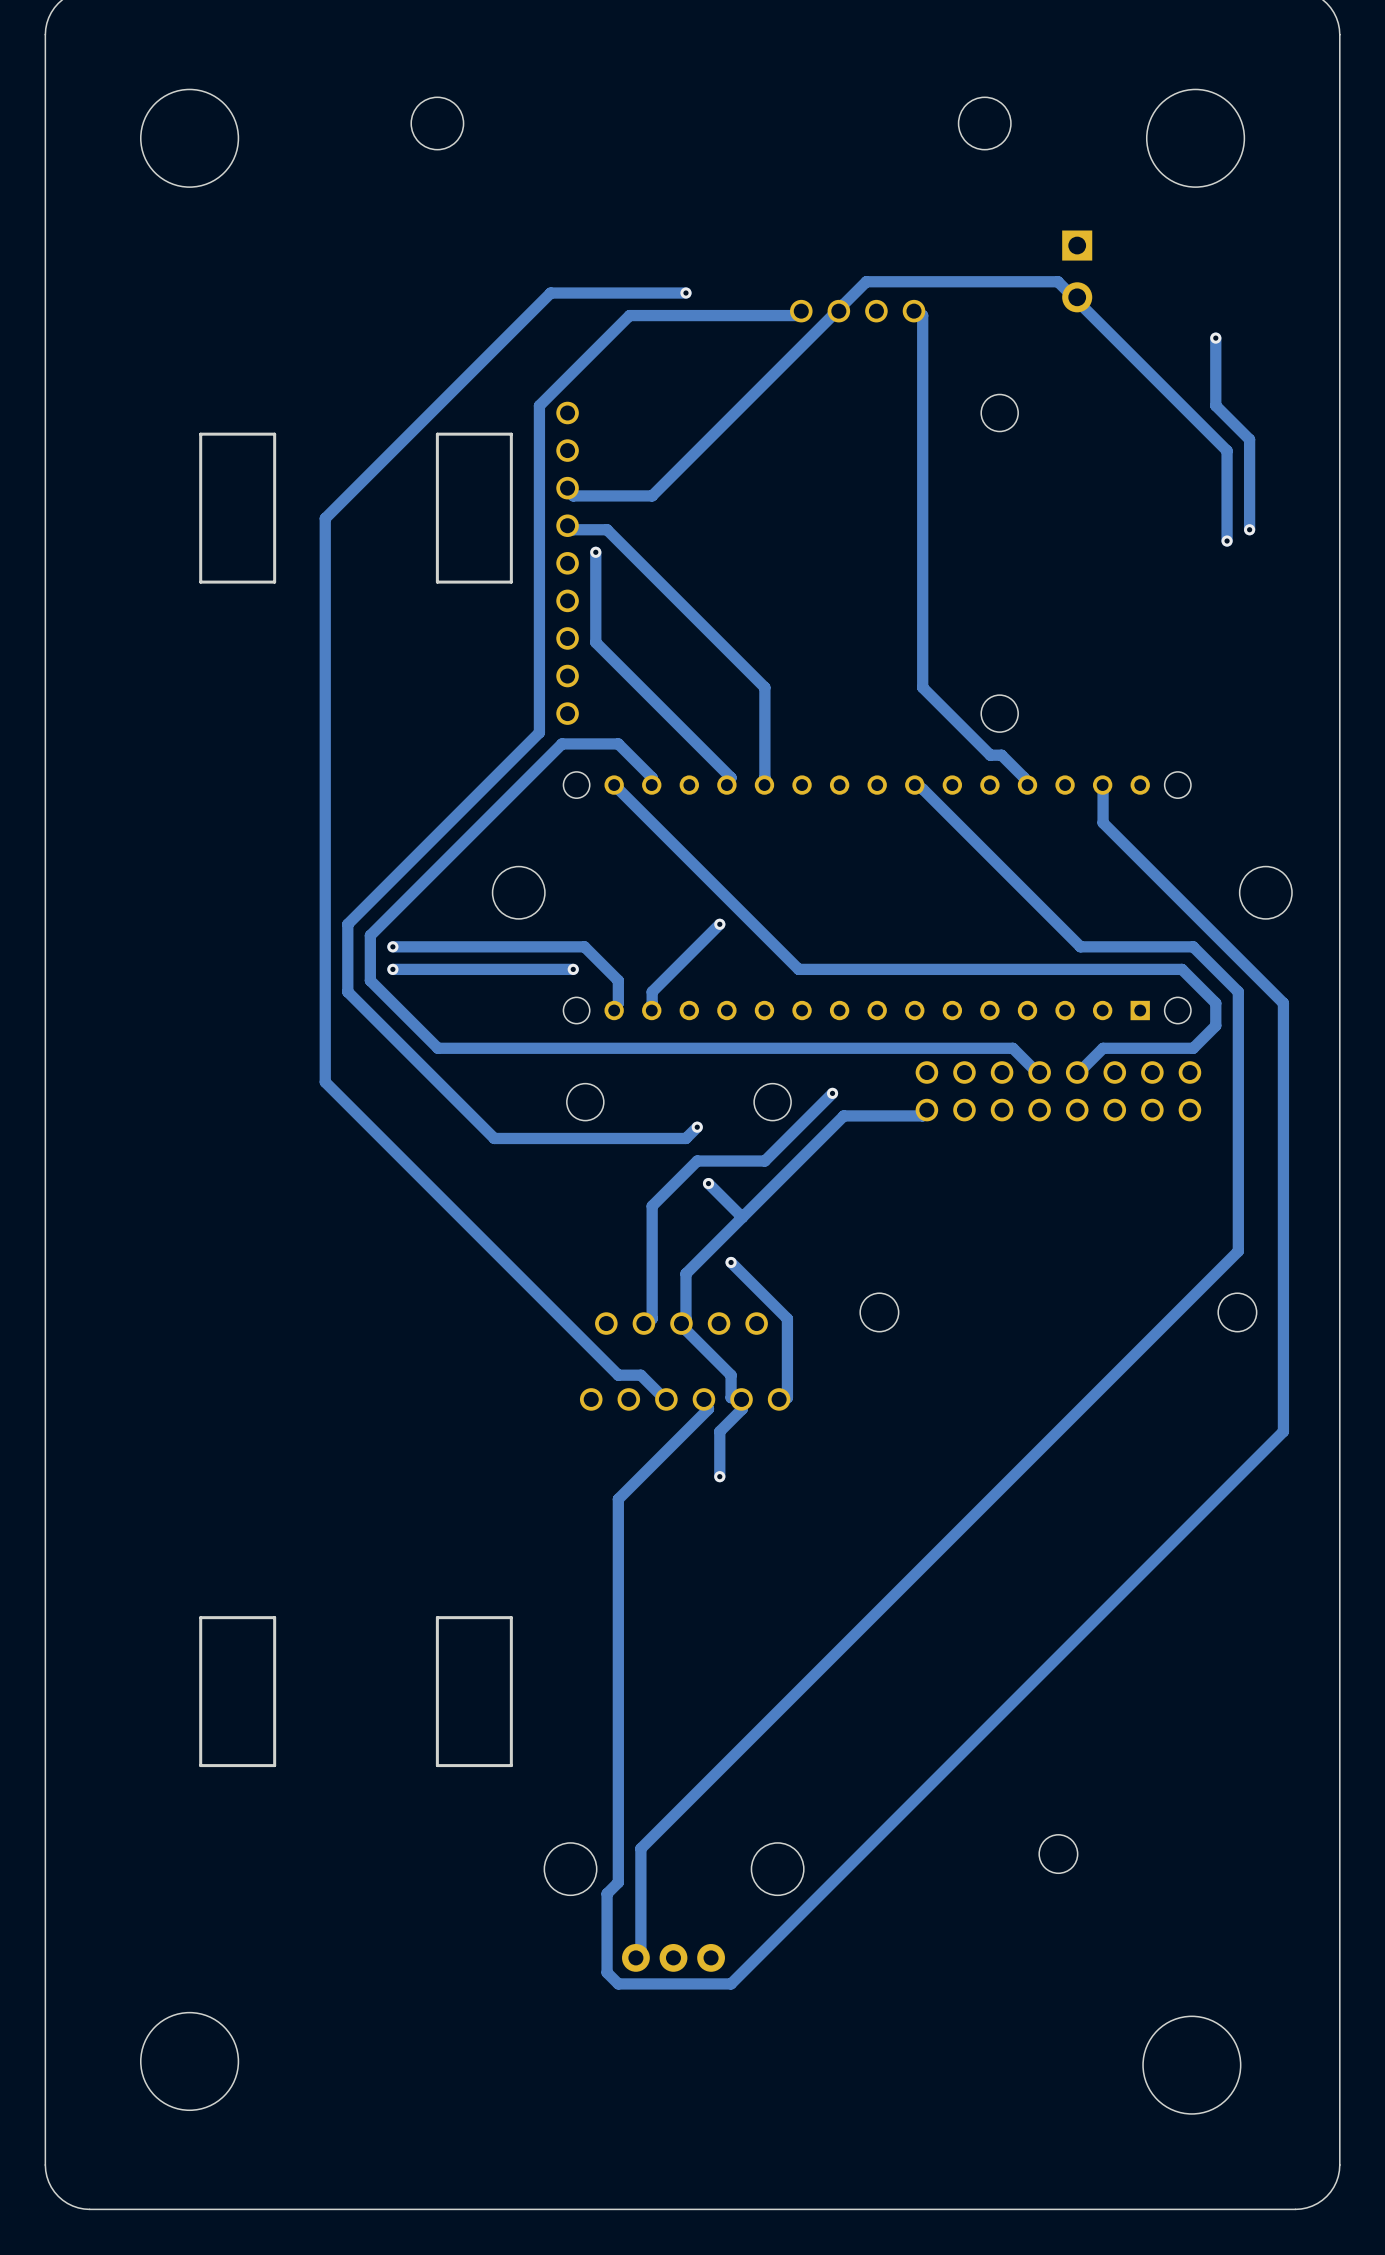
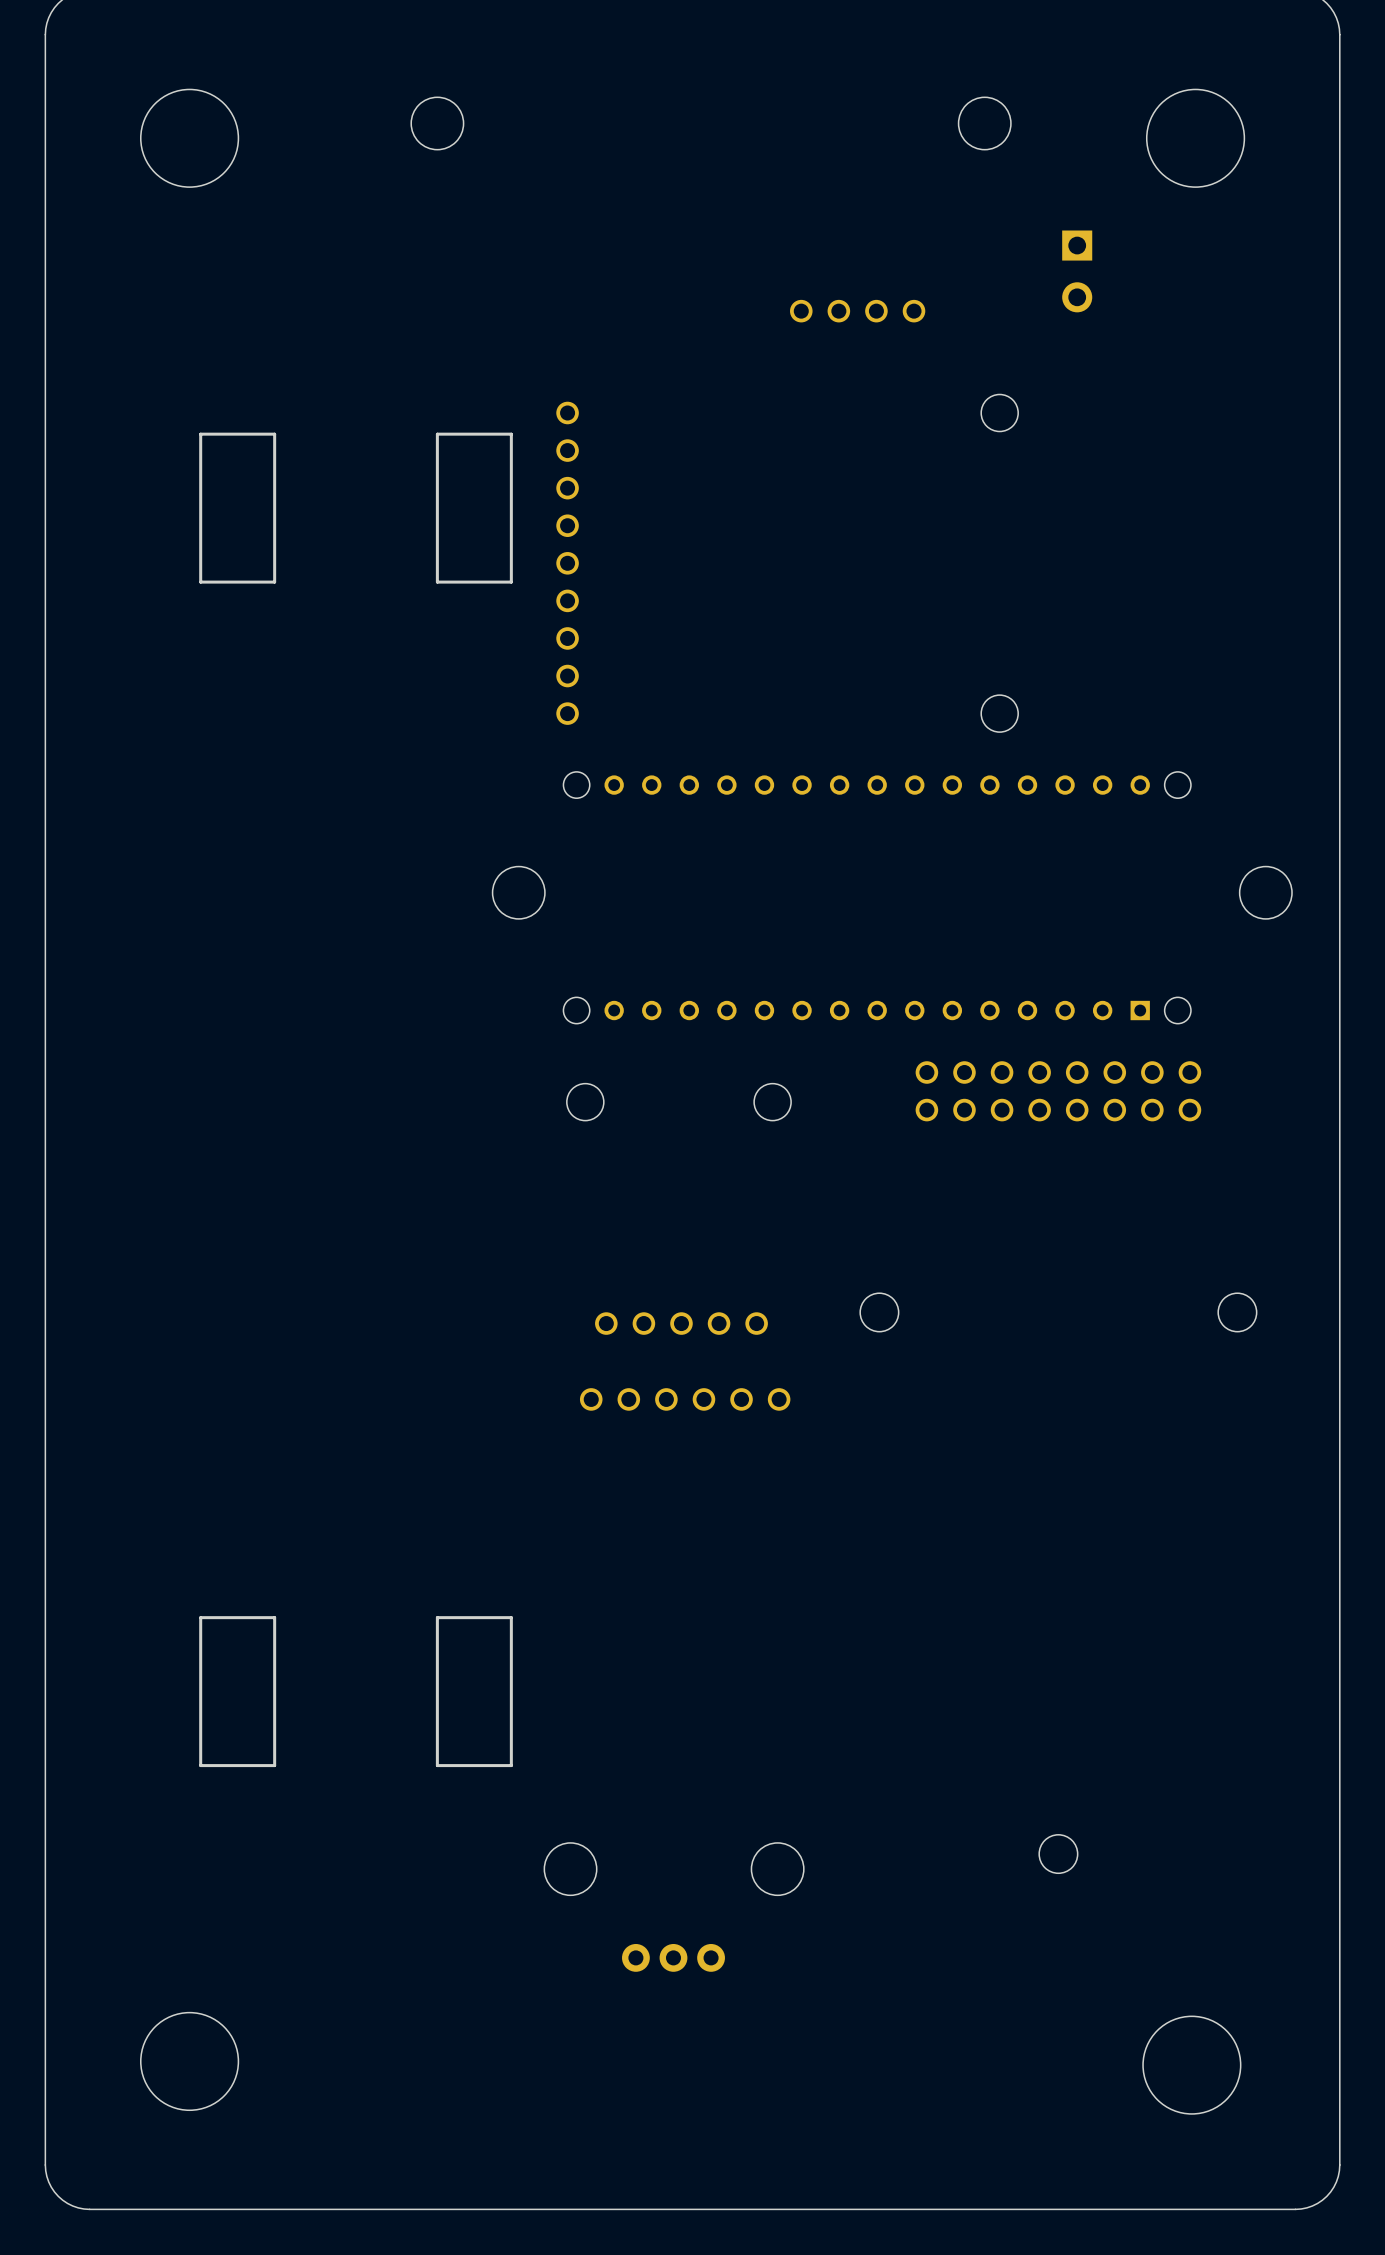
track: (685, 293) (550, 293) (325, 518) (325, 1082) (618, 1375) (640, 1375) (666, 1399) -> none
via: (685, 293) -> none
track: (801, 311) (798, 315) (629, 315) (539, 405) (539, 732) (347, 924) (347, 991) (494, 1138) (685, 1138) (697, 1127) -> none
track: (914, 311) (922, 315) (922, 687) (990, 755) (1001, 755) (1024, 777) (1027, 785) -> none
track: (1215, 338) (1215, 405) (1249, 439) (1249, 529) -> none
via: (1215, 338) -> none
track: (567, 488) (573, 495) (652, 495) (866, 281) (1057, 281) (1069, 293) (1077, 297) (1080, 304) (1227, 450) (1227, 541) -> none
track: (567, 525) (573, 529) (607, 529) (764, 687) (764, 785) -> none
via: (1249, 529) -> none
via: (1227, 541) -> none
track: (595, 552) (595, 642) (731, 777) (726, 785) -> none
via: (595, 552) -> none
track: (614, 785) (798, 969) (1181, 969) (1215, 1003) (1215, 1025) (1193, 1048) (1103, 1048) (1077, 1072) -> none
track: (651, 785) (652, 777) (618, 743) (561, 743) (370, 935) (370, 980) (437, 1048) (1012, 1048) (1035, 1070) (1039, 1072) -> none
track: (914, 785) (922, 789) (1080, 946) (1193, 946) (1238, 991) (1238, 1251) (640, 1848) (640, 1950) (635, 1957) -> none
track: (1102, 785) (1103, 822) (1283, 1003) (1283, 1431) (731, 1983) (618, 1983) (607, 1972) (607, 1893) (618, 1882) (618, 1499) (708, 1409) (703, 1399) -> none
track: (719, 924) (652, 991) (651, 1010) -> none
via: (719, 924) -> none
track: (392, 946) (584, 946) (618, 980) (618, 1003) (614, 1010) -> none
via: (392, 946) -> none
via: (392, 969) -> none
track: (573, 969) (392, 969) -> none
via: (573, 969) -> none
track: (832, 1093) (764, 1161) (697, 1161) (652, 1206) (652, 1318) (643, 1323) -> none
via: (832, 1093) -> none
track: (926, 1110) (922, 1115) (843, 1115) (685, 1273) (685, 1318) (681, 1323) (731, 1375) (731, 1397) (741, 1399) (742, 1409) (719, 1431) (719, 1476) -> none
via: (697, 1127) -> none
track: (708, 1183) (742, 1217) -> none
via: (708, 1183) -> none
track: (731, 1262) (787, 1318) (787, 1397) (779, 1399) -> none
via: (731, 1262) -> none
via: (719, 1476) -> none

